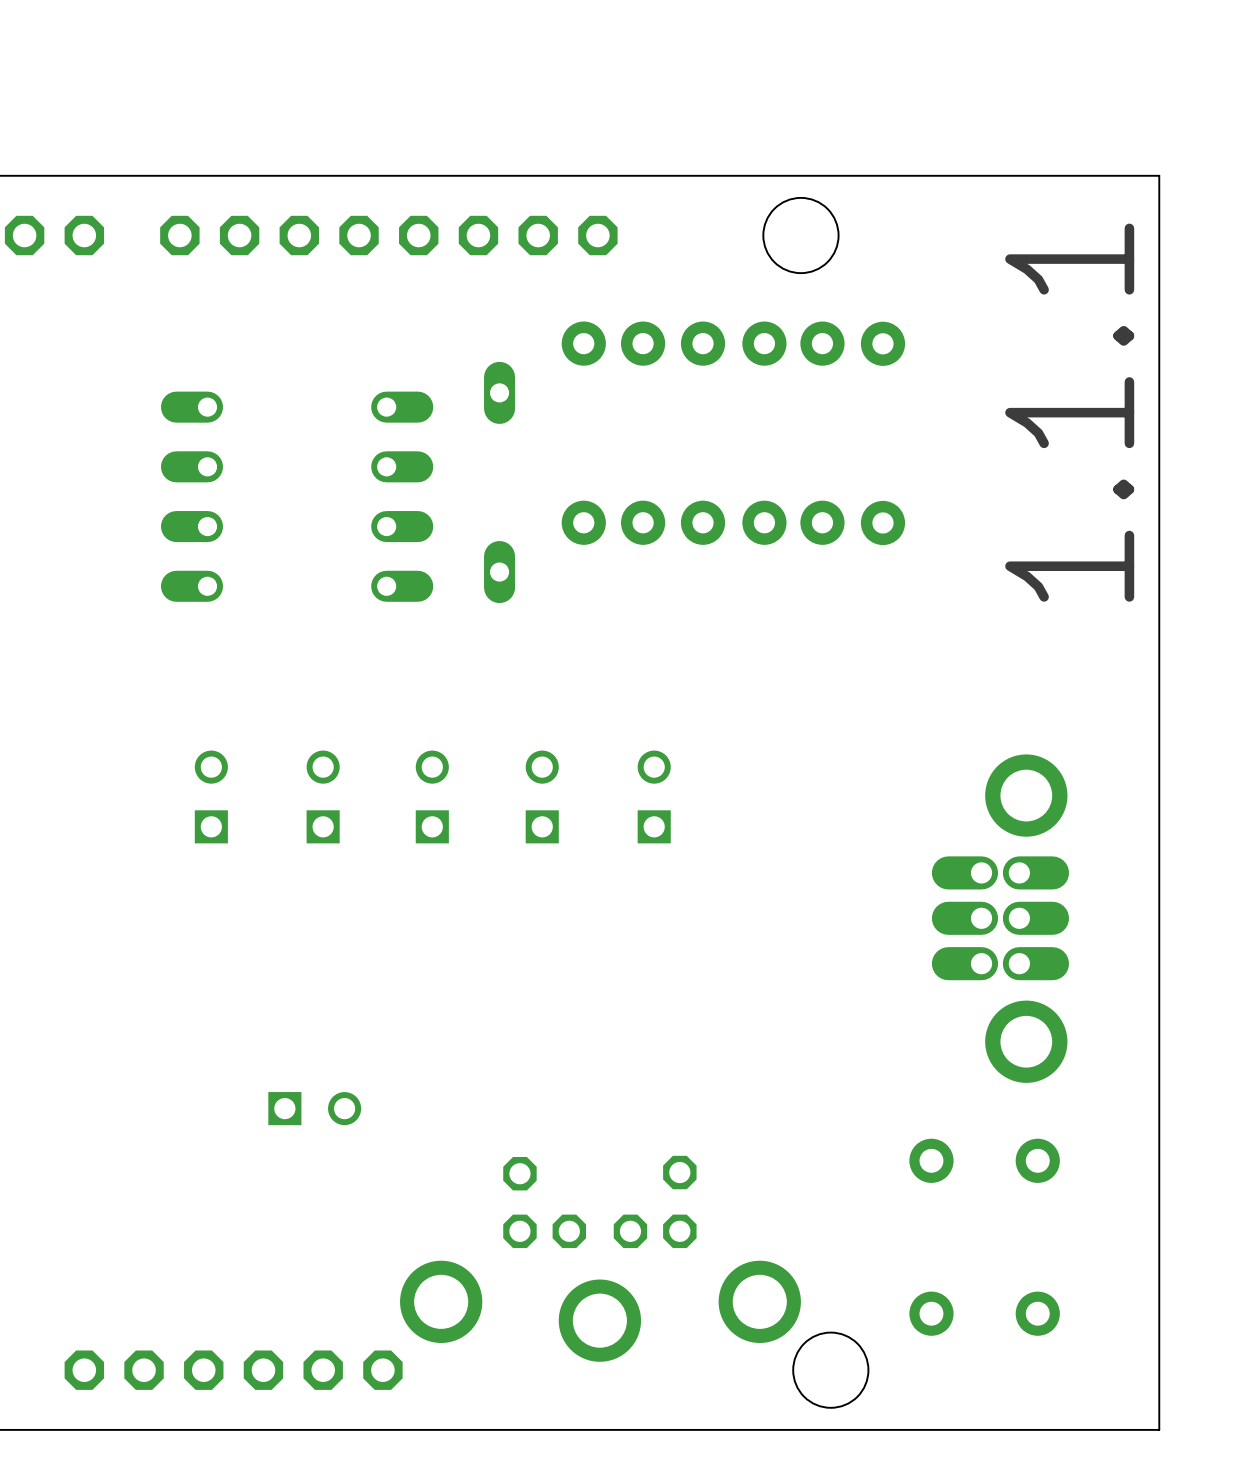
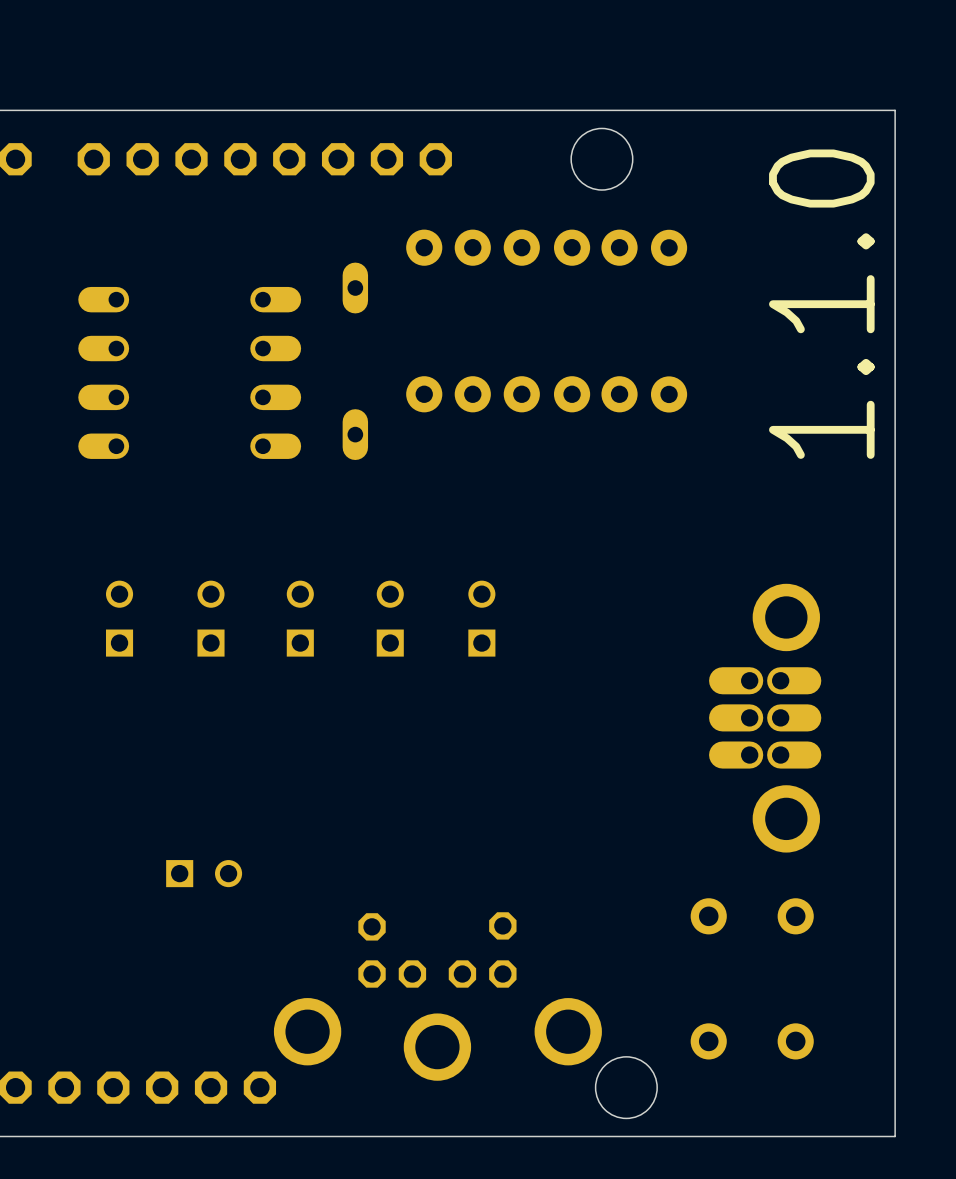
text: 1.1.1 (1069, 412) -> 1.1.0 (821, 304)

